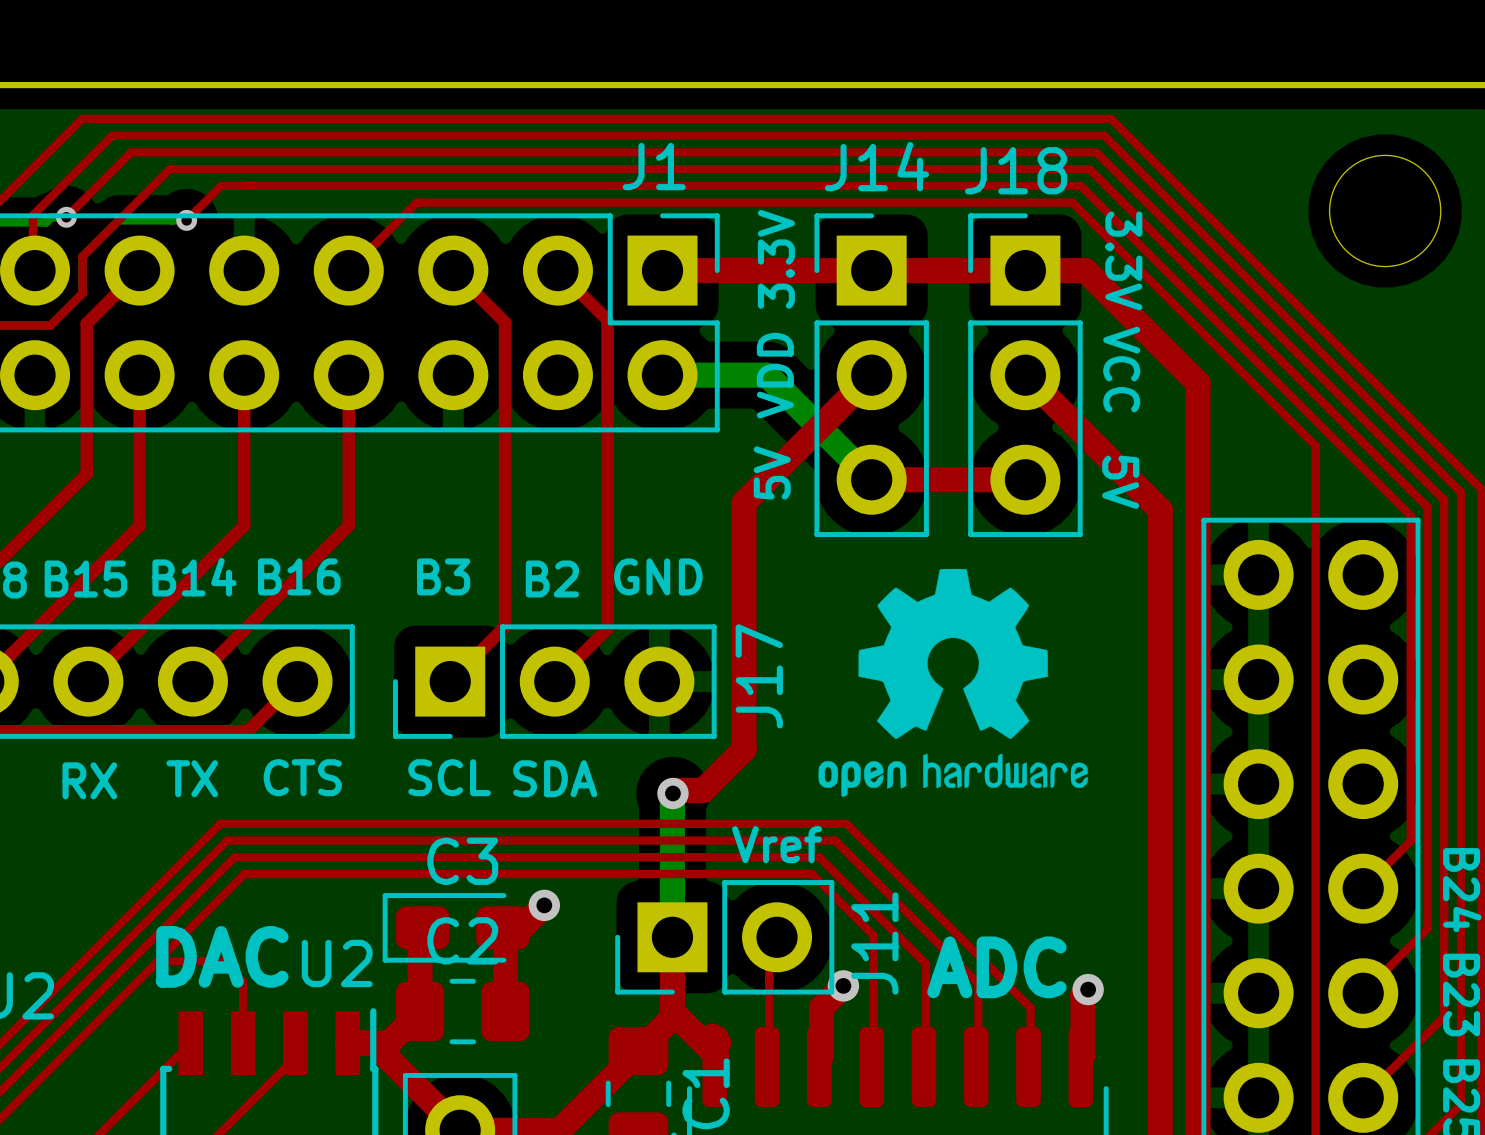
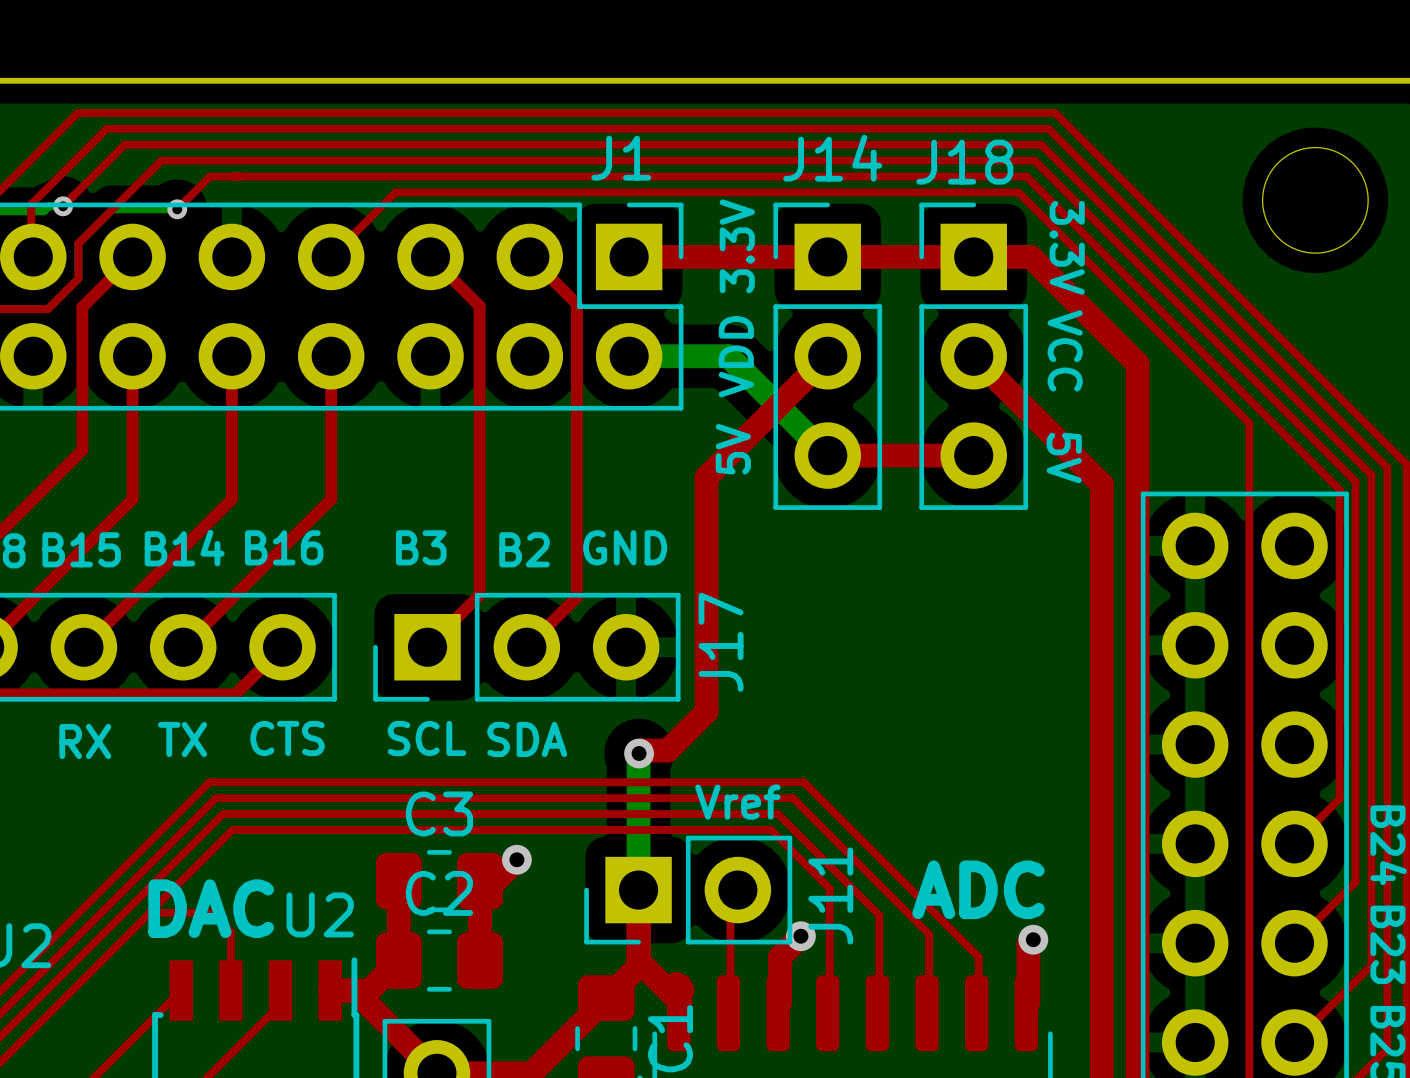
drawing: [818, 568, 1088, 797] -> none
C3 footprint: [382, 893, 530, 963] -> [375, 850, 503, 913]
text position: ADC (996, 967) -> ADC (978, 889)

